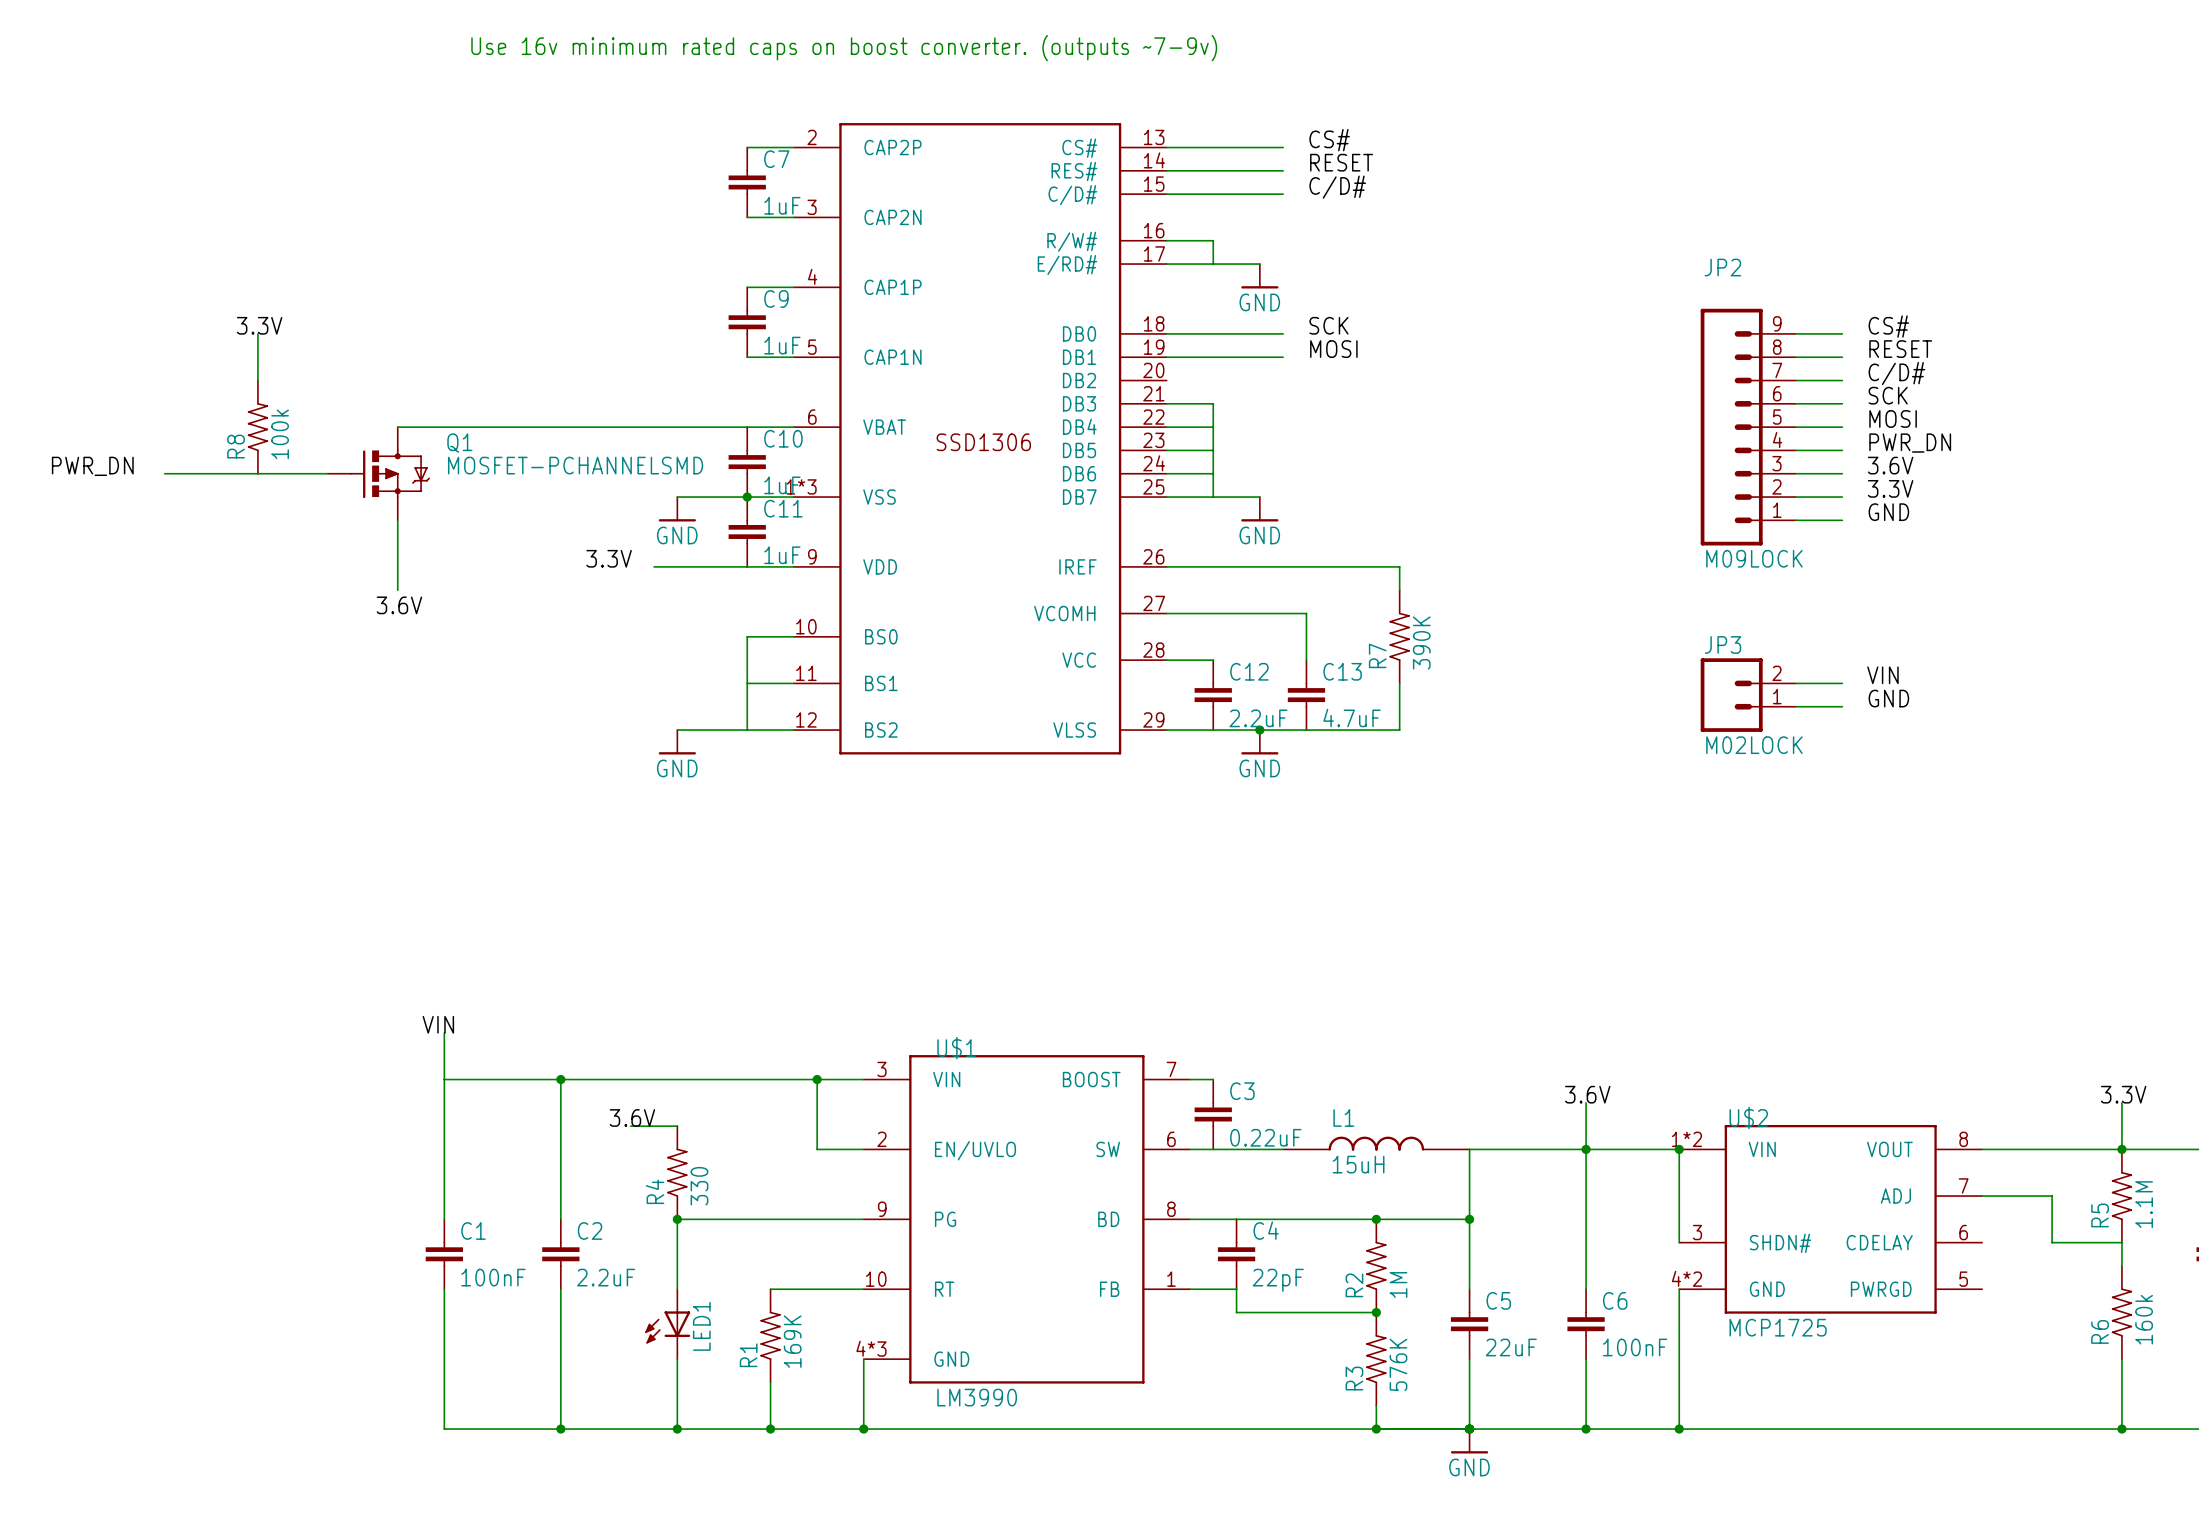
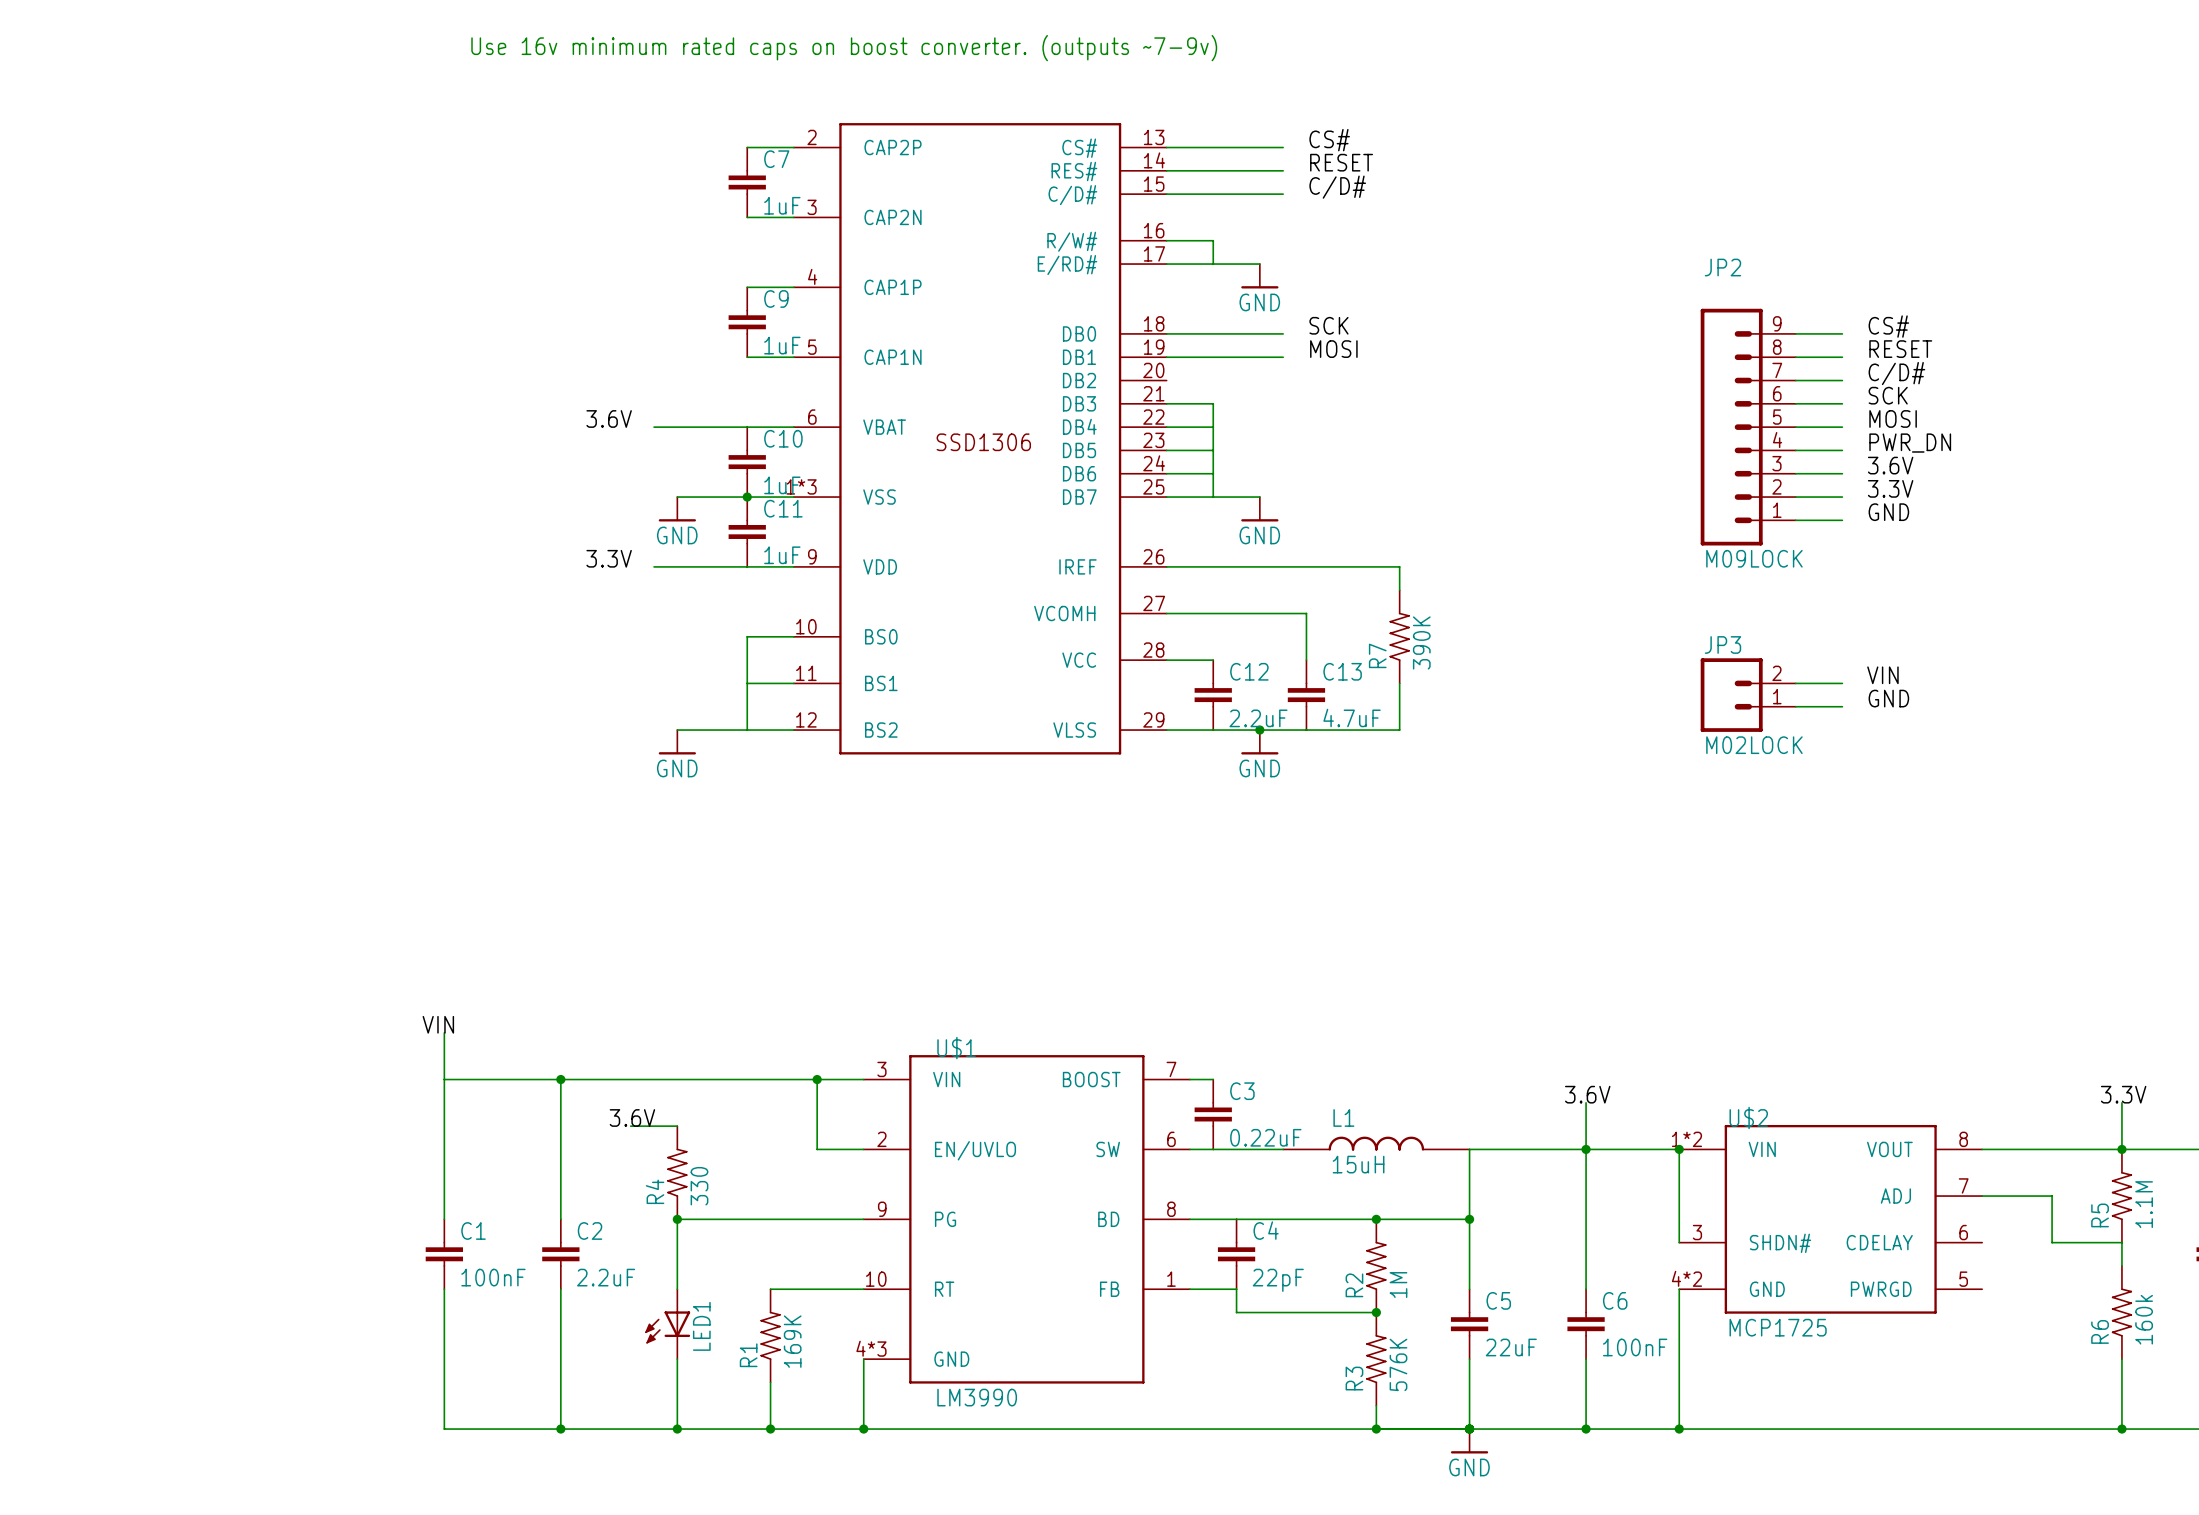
label: 3.3V (259, 325) -> none
wire: (257, 333) (257, 380) -> none
label: none -> 3.6V (609, 418)
R8: 100k (257, 427) -> none
wire: (397, 427) (654, 427) -> none
label: PWR_DN (92, 466) -> none
wire: (164, 473) (327, 473) -> none
Q1: MOSFET-PCHANNELSMD (378, 473) -> none
wire: (397, 520) (397, 590) -> none
label: 3.6V (399, 605) -> none

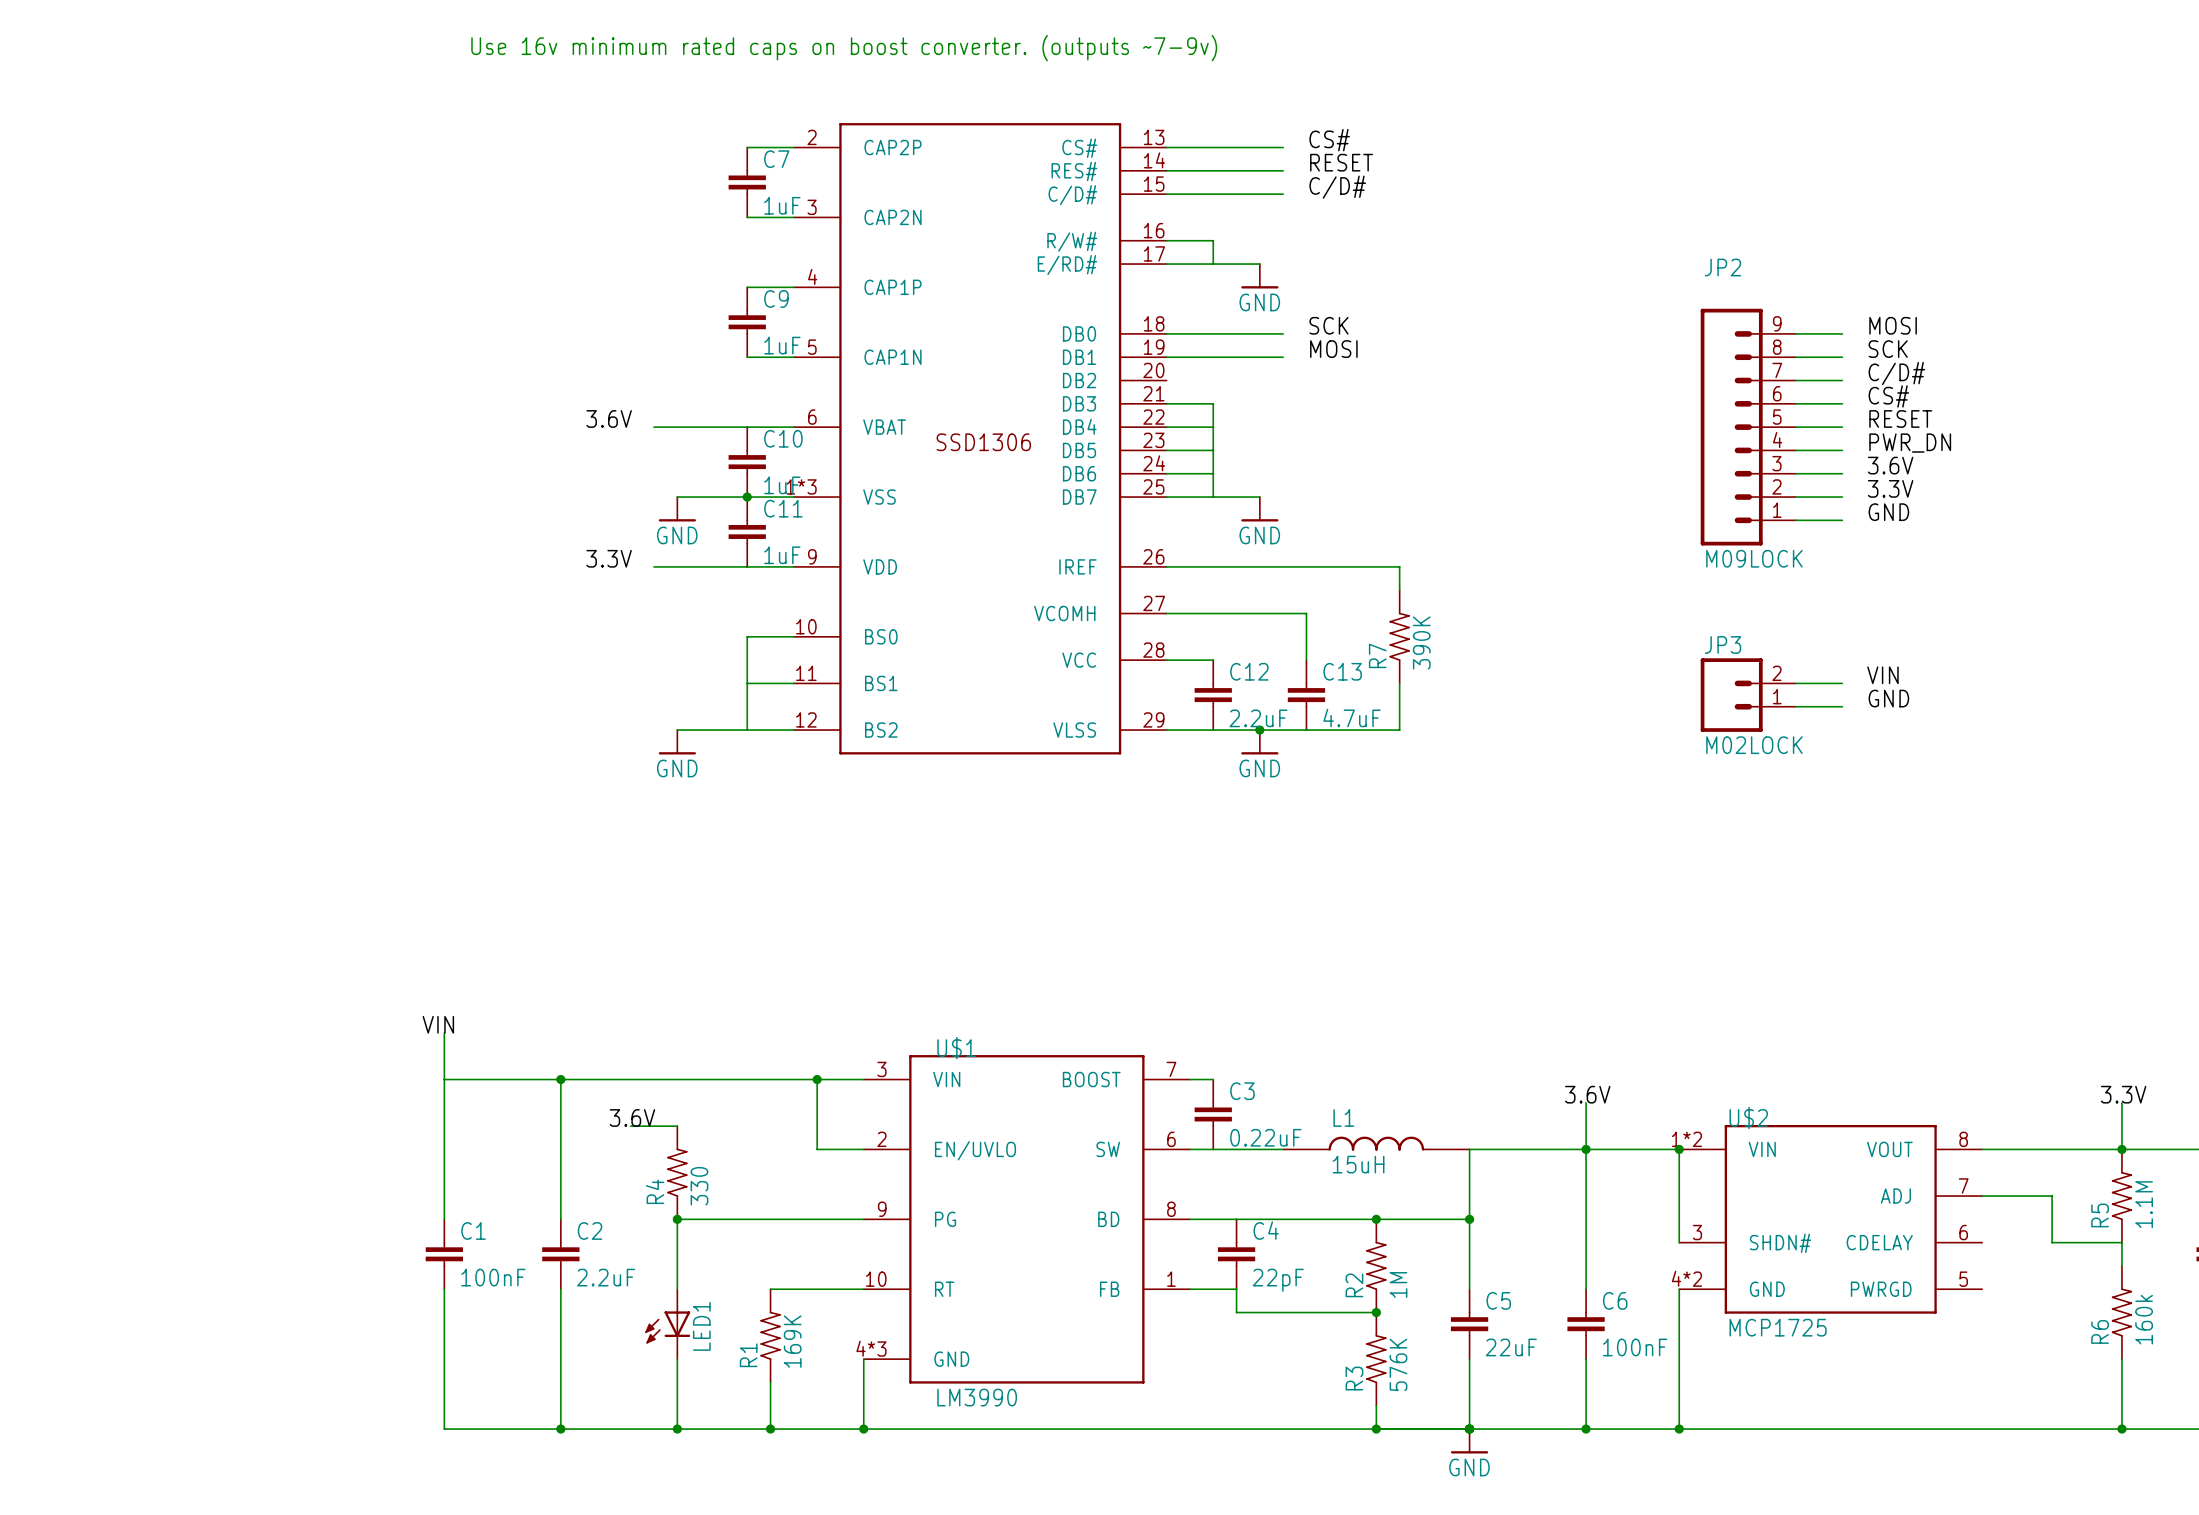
label: CS# (1888, 326) -> MOSI (1893, 325)
label: RESET (1900, 349) -> SCK (1888, 349)
label: SCK (1888, 395) -> CS# (1888, 396)
label: MOSI (1893, 418) -> RESET (1900, 418)

